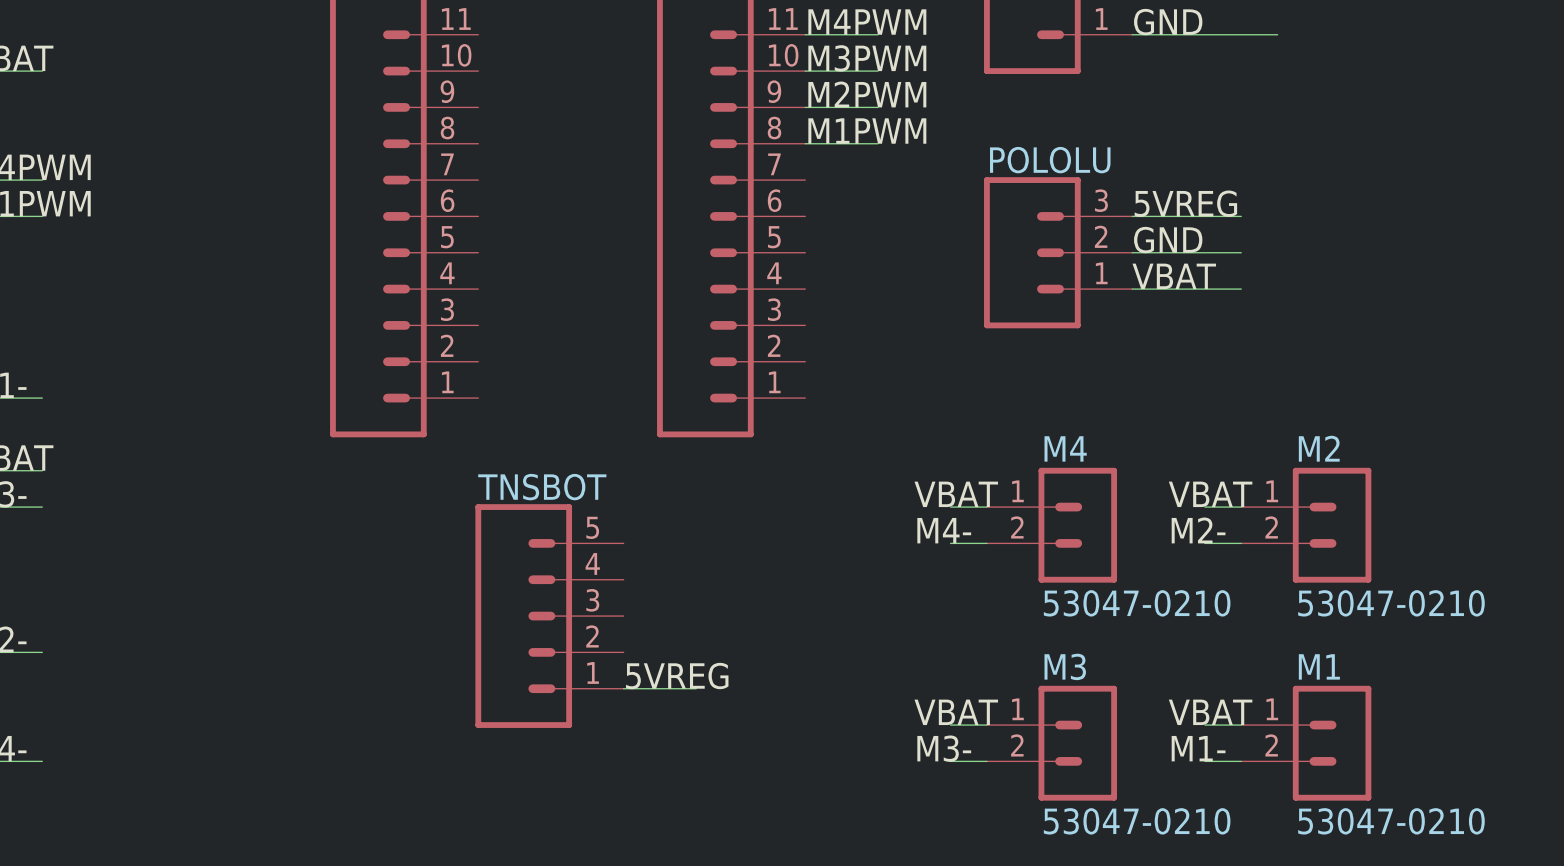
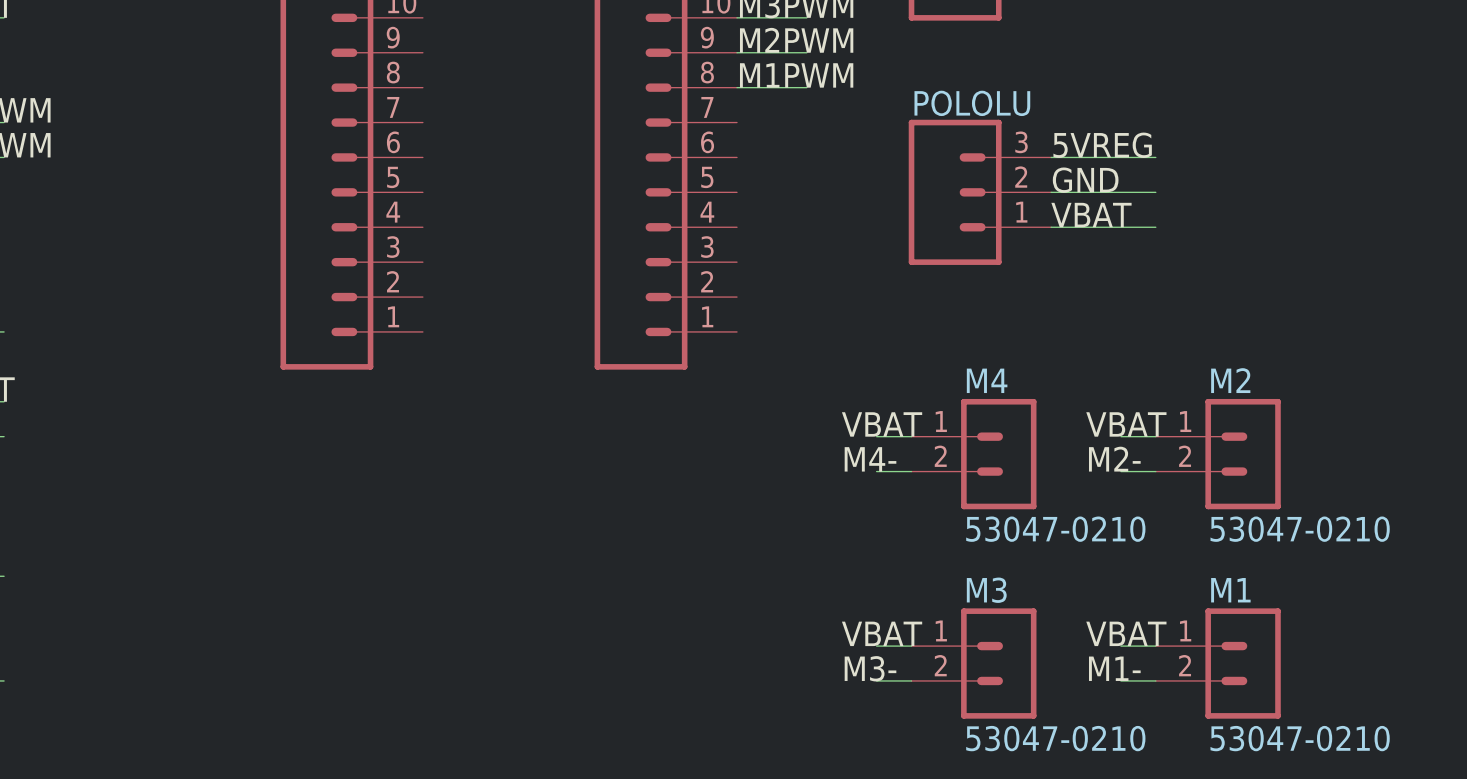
TNSBOT: (549, 616) -> none
label: 5VREG (677, 676) -> none
wire: (623, 688) (696, 688) -> none

